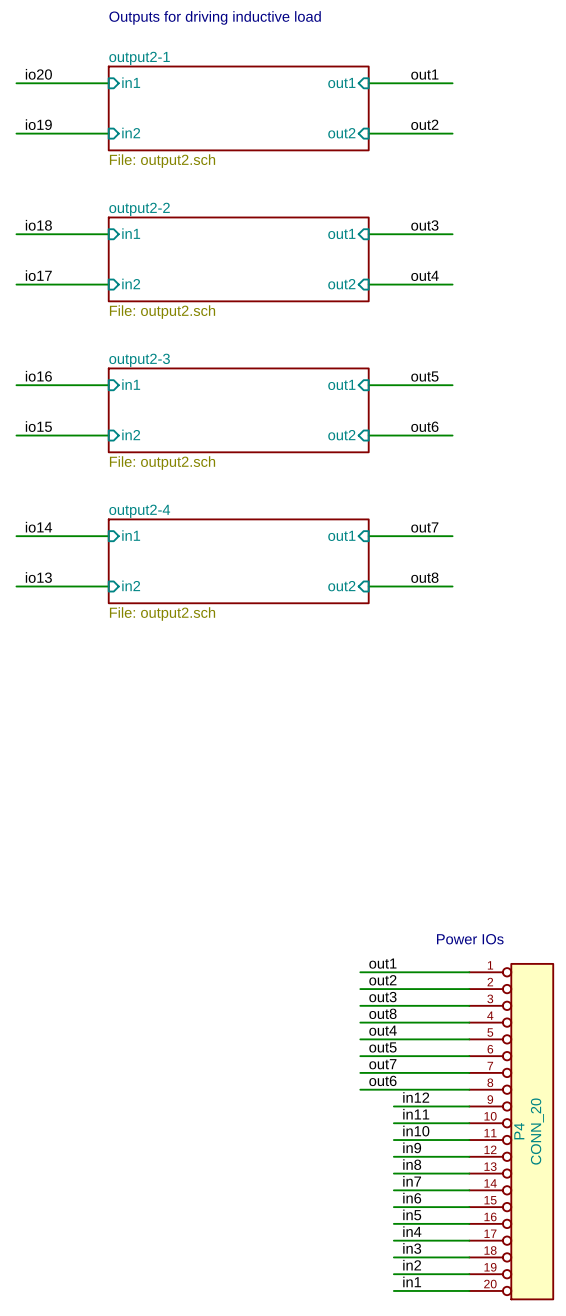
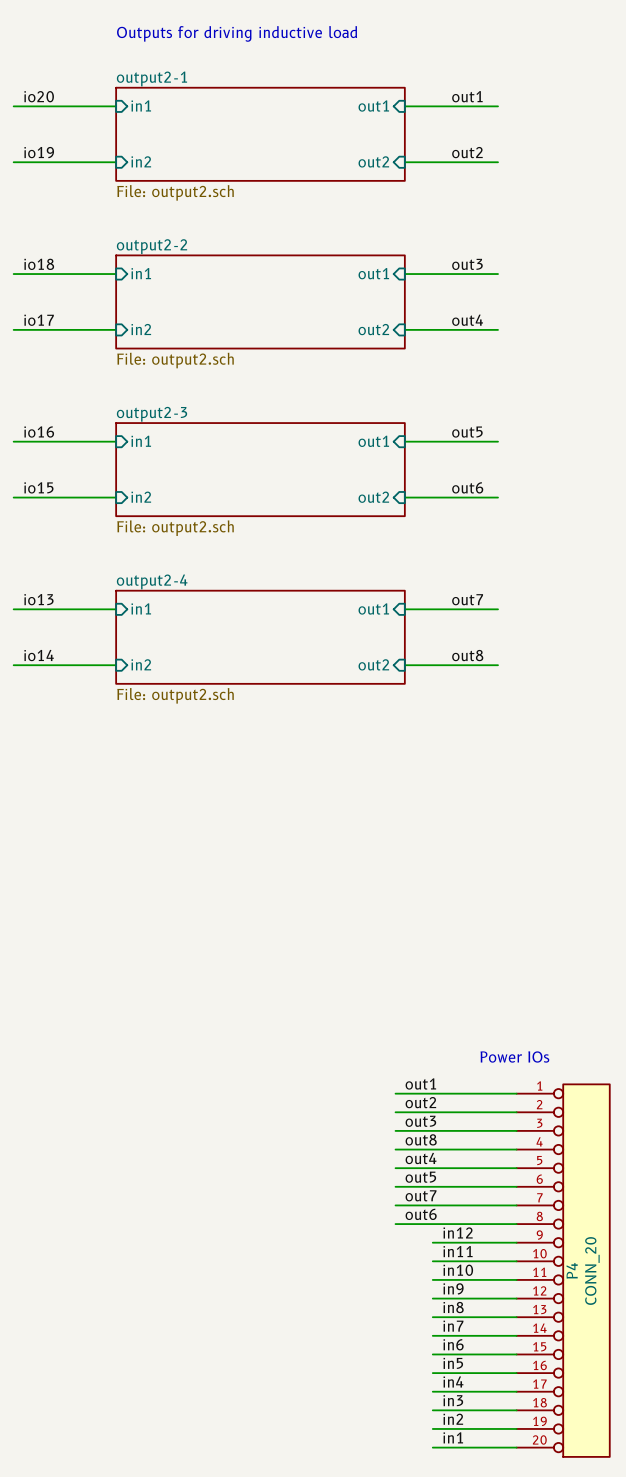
label: io14 (38, 527) -> io13 (38, 599)
label: io13 (38, 577) -> io14 (39, 655)

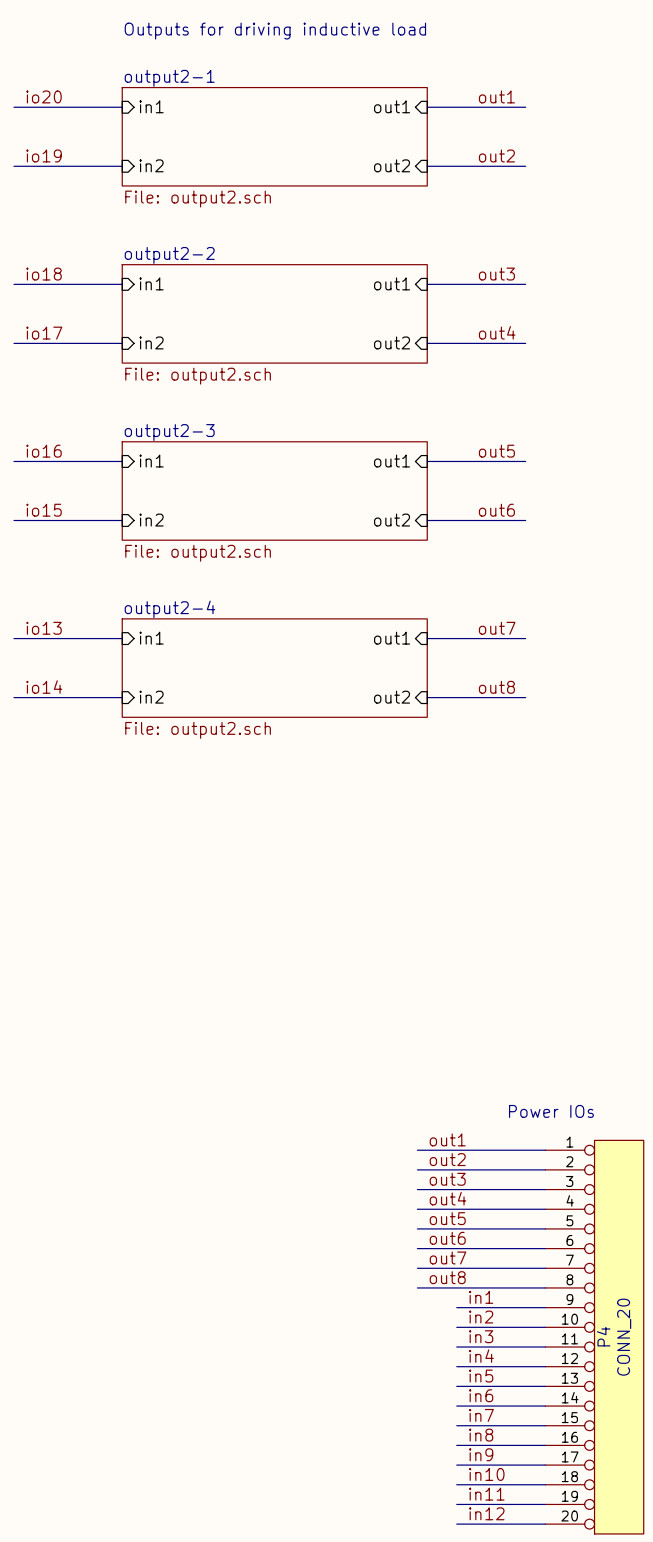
label: out8 (421, 1139) -> out4 (447, 1198)
label: out4 (421, 1158) -> out5 (447, 1218)
label: out5 (420, 1177) -> out6 (447, 1238)
label: out6 (421, 1214) -> out8 (447, 1277)
label: in12 (458, 1232) -> in1 (481, 1297)
label: in11 (458, 1251) -> in2 (481, 1317)
label: in10 (458, 1270) -> in3 (481, 1336)
label: in9 (453, 1288) -> in4 (481, 1356)
label: in8 (453, 1307) -> in5 (481, 1376)
label: in7 (453, 1326) -> in6 (481, 1395)
label: in6 (453, 1344) -> in7 (481, 1415)
label: in5 (453, 1363) -> in8 (481, 1435)
label: in4 (453, 1381) -> in9 (481, 1454)
label: in3 (453, 1400) -> in10 (486, 1474)
label: in2 (453, 1419) -> in11 (486, 1494)
label: in1 (453, 1437) -> in12 (486, 1513)

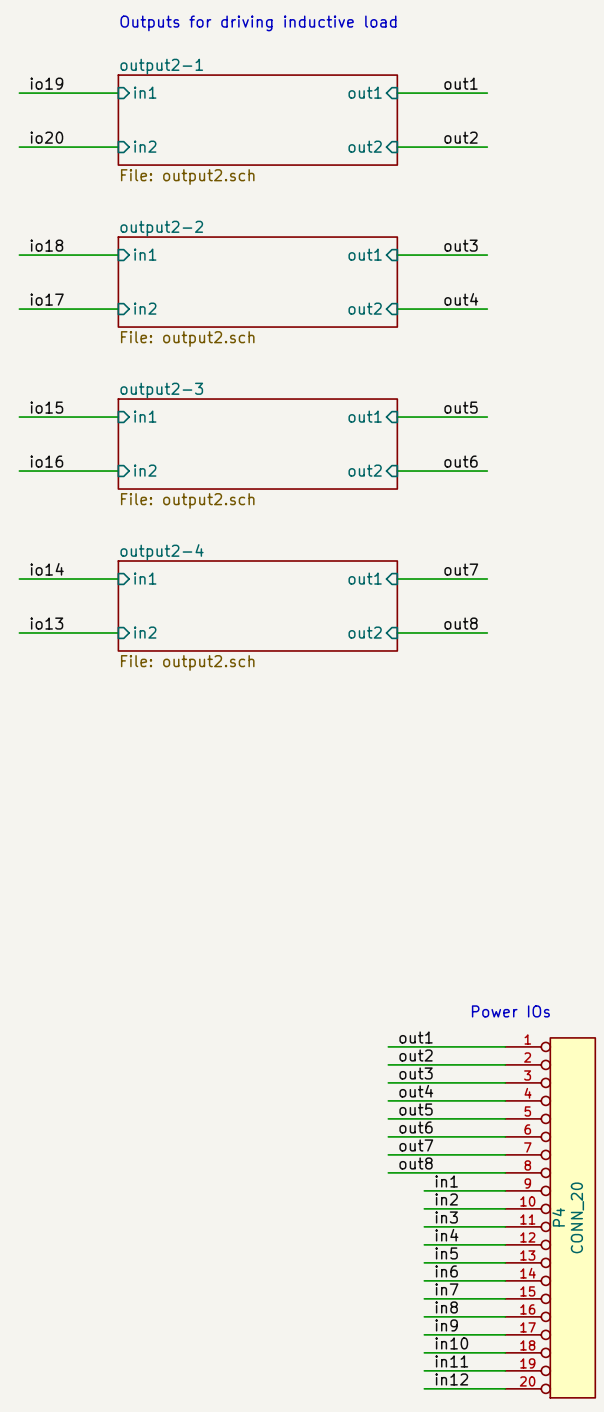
label: io20 (44, 96) -> io19 (46, 83)
label: io19 (44, 155) -> io20 (46, 137)
label: io16 (44, 451) -> io15 (46, 407)
label: io15 (44, 510) -> io16 (46, 461)
label: io13 (44, 628) -> io14 (47, 569)
label: io14 (44, 687) -> io13 (46, 623)

